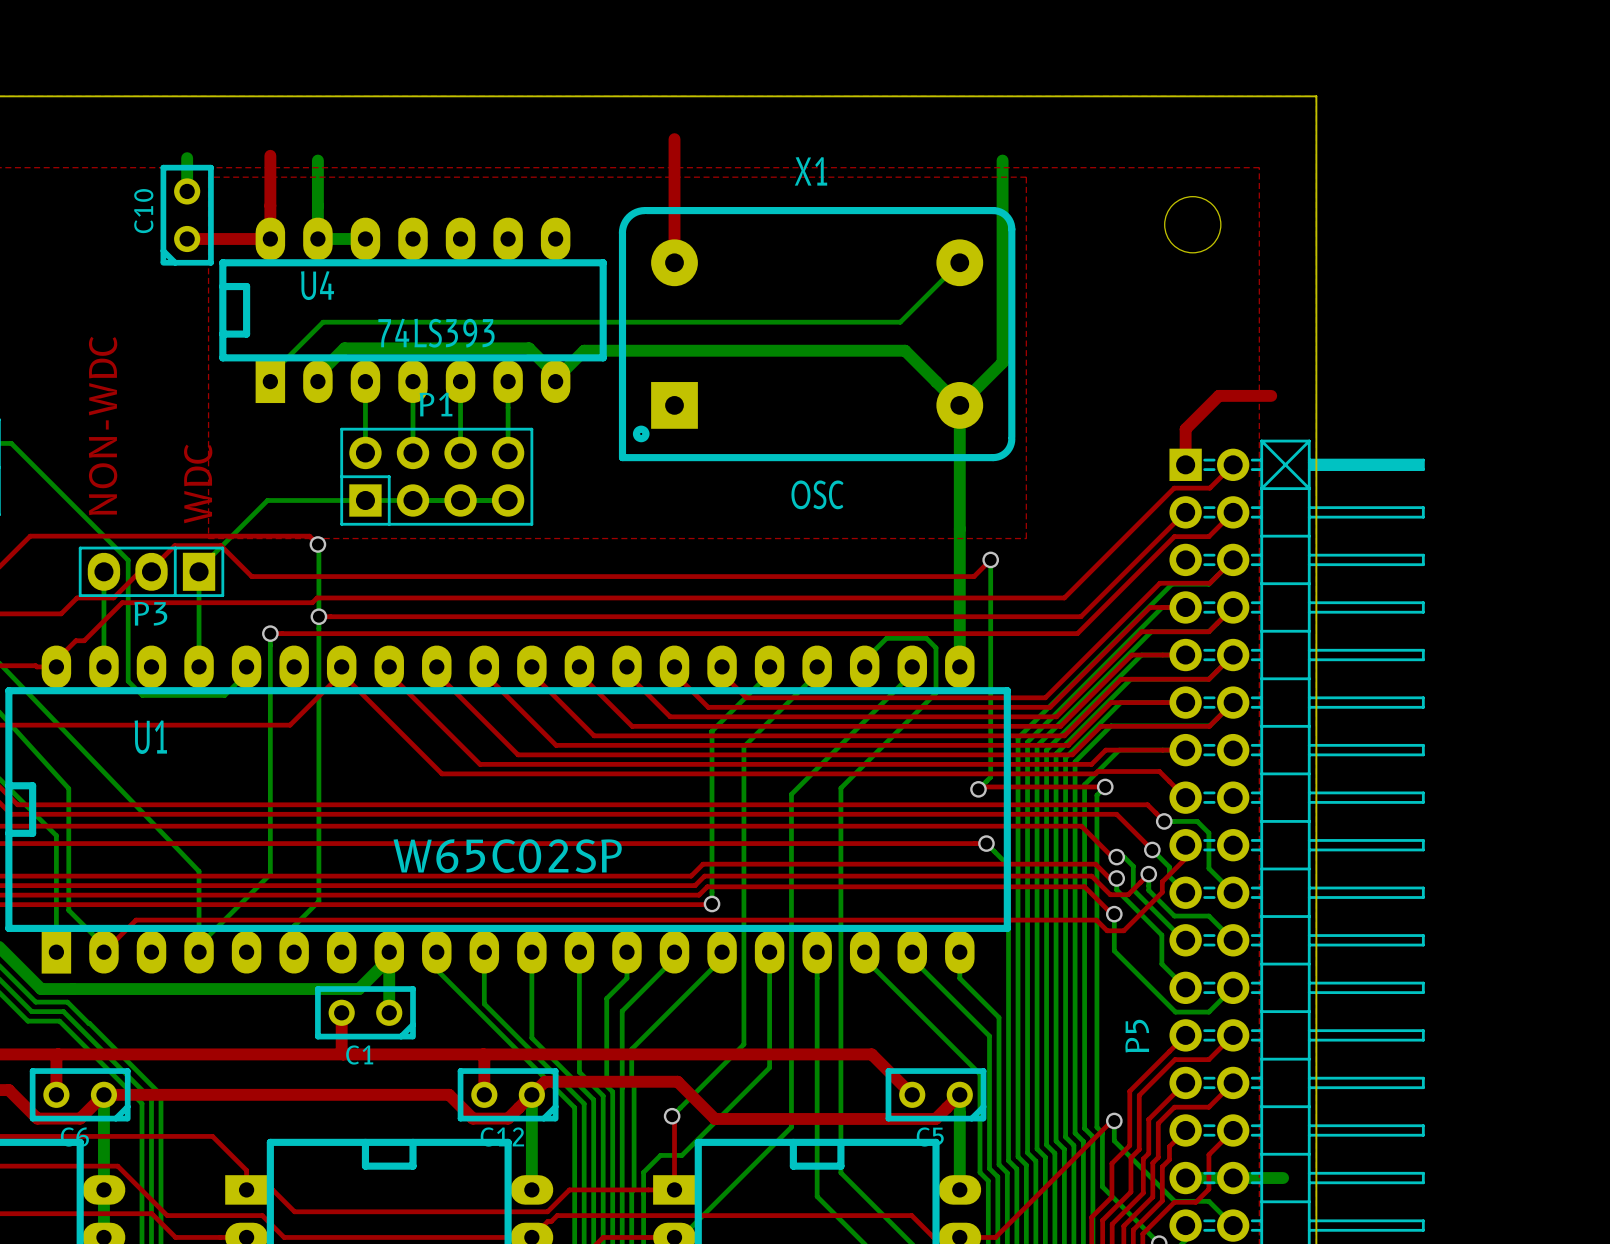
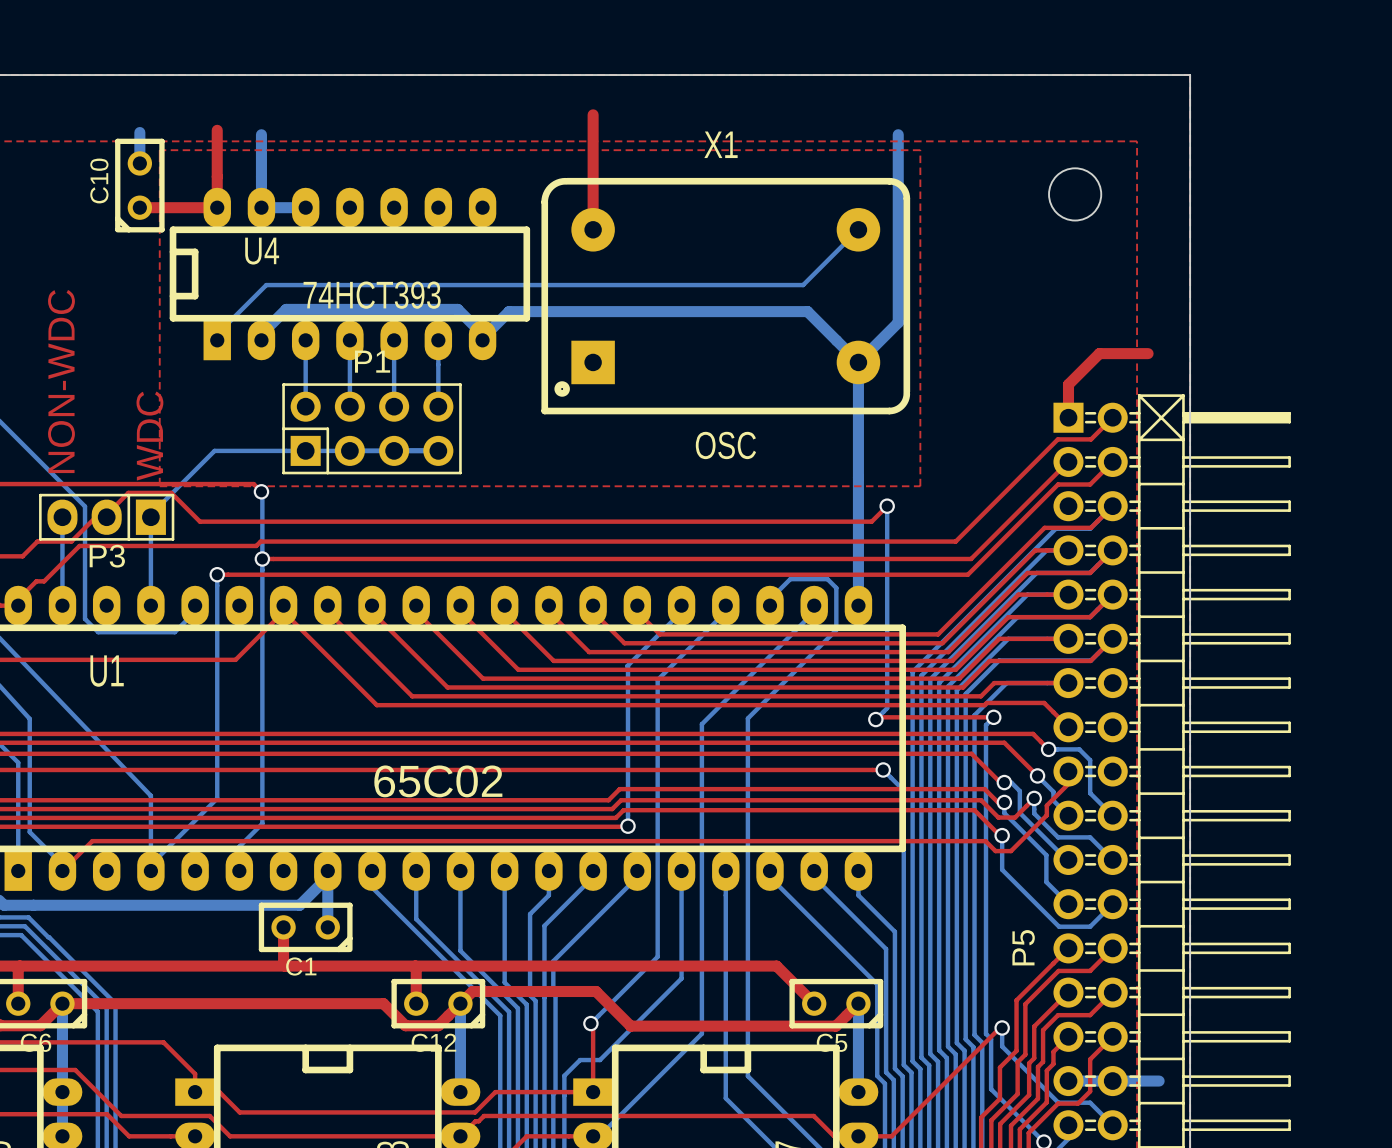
U4 value: 74LS393 (436, 333) -> 74HCT393 (372, 295)
U1 value: W65C02SP (507, 856) -> 65C02 (438, 781)

